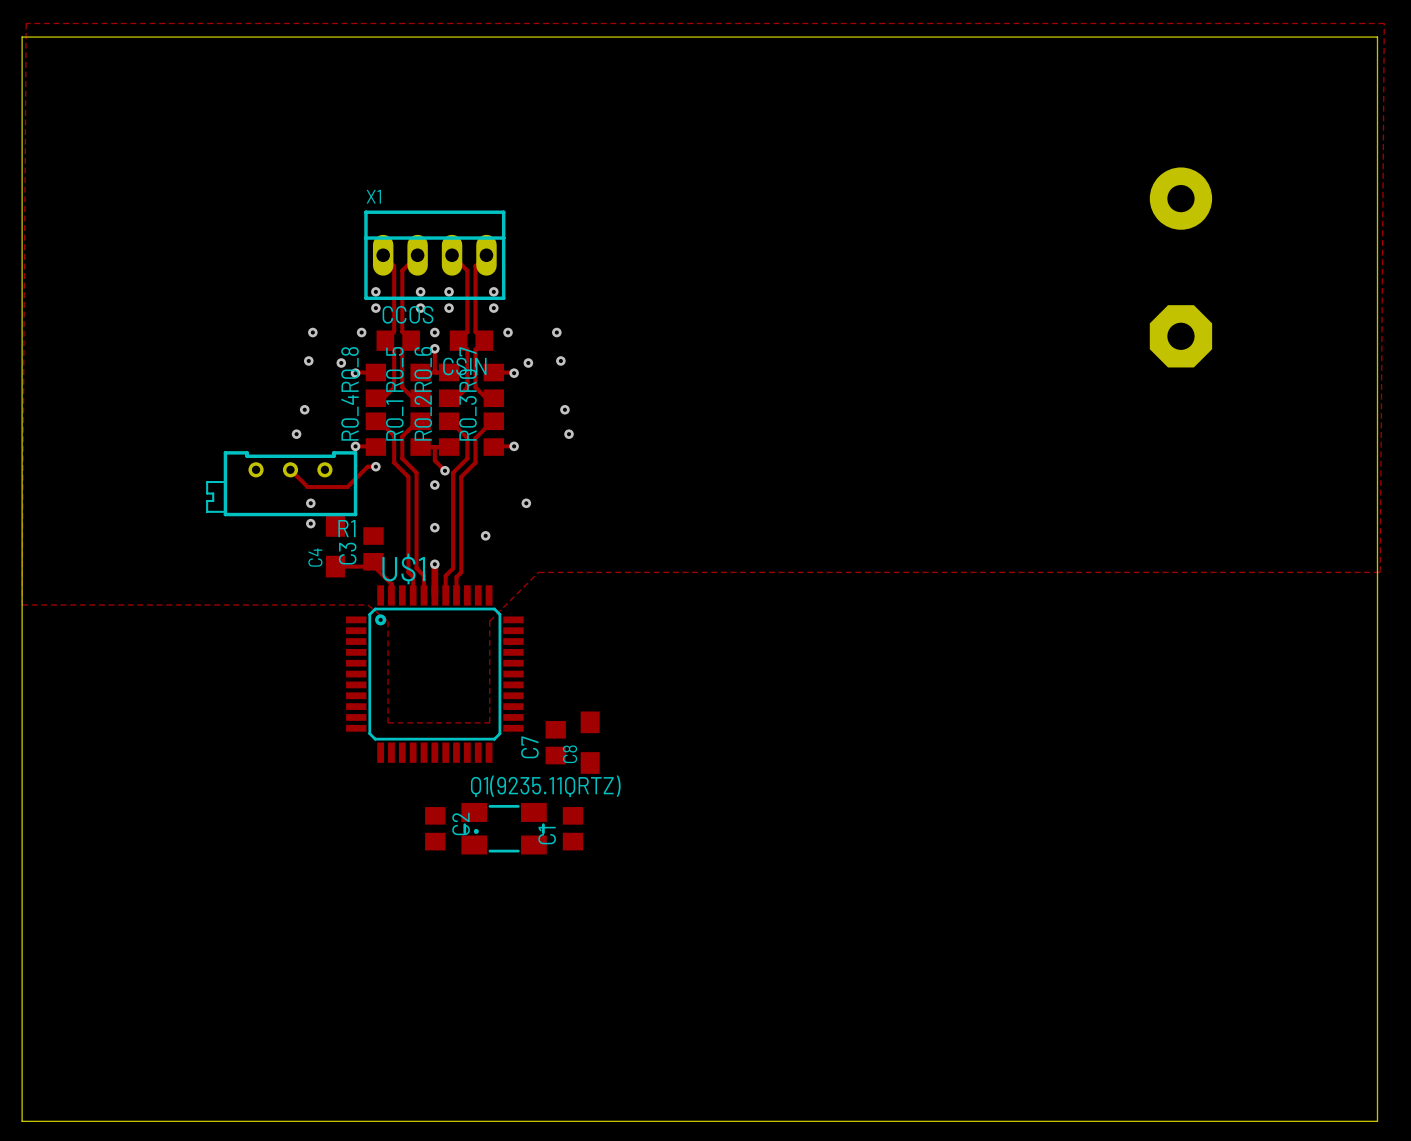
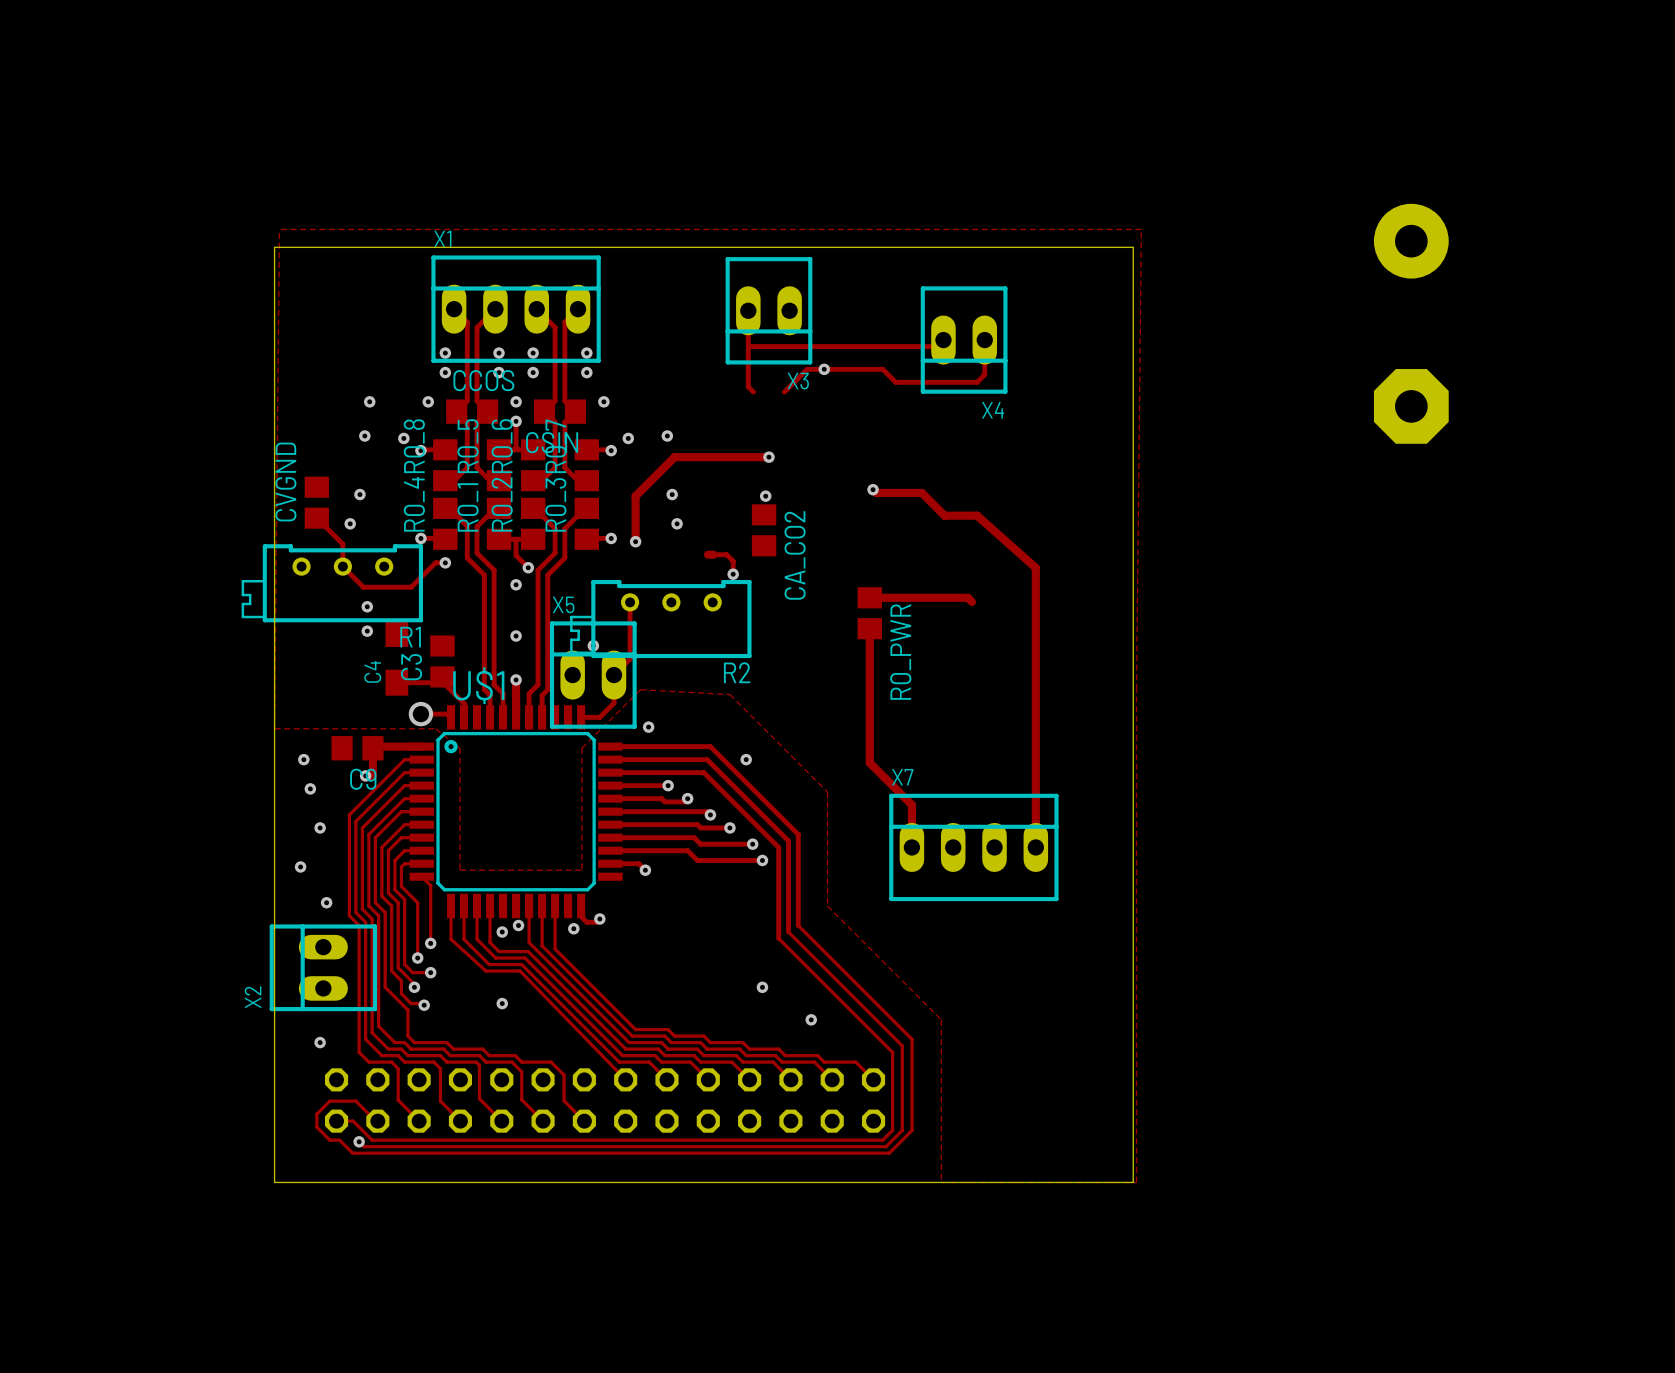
board edge: (22, 37) (1377, 37) (1377, 1121) (22, 1121) (22, 37) -> none
board edge: none -> (274, 247) (1133, 247) (1133, 1182) (274, 1182) (274, 247)
track: none -> (748, 310) (748, 386) (753, 392)
X3: none -> (768, 310)
track: none -> (943, 340) (936, 346) (748, 346)
X4: none -> (964, 340)
track: none -> (984, 340) (984, 374) (977, 382) (895, 382) (882, 369) (807, 369) (784, 392)
via: none -> (824, 369)
via: (556, 332) -> none
track: none -> (768, 457) (674, 457) (635, 496) (635, 541)
via: none -> (768, 457)
track: none -> (873, 489) (876, 492) (921, 492) (944, 515) (977, 515) (1035, 567) (1035, 847)
via: none -> (873, 489)
via: none -> (765, 496)
CVGND: none -> (316, 502)
track: none -> (316, 518) (342, 544) (342, 566)
CA_CO2: none -> (764, 530)
via: none -> (635, 541)
track: none -> (707, 554) (726, 554) (733, 561) (733, 574)
via: none -> (733, 574)
track: none -> (869, 597) (967, 597) (971, 601)
track: none -> (630, 602) (630, 658) (613, 675) (613, 703) (599, 717) (581, 717)
via: (526, 503) -> none
R0_PWR: none -> (869, 613)
R2: none -> (660, 619)
track: none -> (869, 628) (869, 762) (911, 805) (911, 847)
via position: (485, 535) -> (593, 645)
X5: none -> (593, 675)
zone outline: (538, 572) (1380, 572) (1384, 23) (26, 23) (22, 604) (233, 604) -> (640, 689) (729, 694) (827, 792) (827, 906) (941, 1019) (941, 1182) (1136, 1182) (1136, 689) (1141, 229) (279, 229) (274, 728)
track: none -> (420, 714) (447, 714) (451, 717)
via: none -> (420, 714)
via: none -> (648, 727)
track: none -> (421, 746) (374, 746) (372, 748) (372, 775) (365, 775)
track: none -> (610, 746) (710, 746) (798, 834) (798, 925) (912, 1039) (912, 1130) (889, 1153) (352, 1153) (339, 1140) (329, 1140) (316, 1127) (316, 1114) (329, 1101) (355, 1101) (377, 1121)
C9: none -> (357, 748)
via: none -> (303, 759)
track: none -> (421, 759) (404, 759) (349, 814) (349, 915) (359, 925) (359, 1052) (368, 1062) (391, 1062) (398, 1068) (398, 1100) (419, 1121)
track: none -> (610, 759) (707, 759) (788, 840) (788, 932) (902, 1045) (902, 1130) (886, 1146) (364, 1146) (359, 1141)
via: none -> (746, 759)
track: none -> (421, 772) (404, 772) (355, 821) (355, 912) (365, 922) (365, 1039) (381, 1055) (398, 1055) (404, 1062) (433, 1062) (440, 1068) (440, 1101) (460, 1121)
track: none -> (610, 772) (703, 772) (778, 847) (778, 938) (892, 1052) (892, 1130) (882, 1140) (372, 1140) (353, 1121) (336, 1121)
via: none -> (365, 775)
track: none -> (421, 785) (404, 785) (362, 827) (362, 909) (372, 919) (372, 1032) (388, 1049) (401, 1049) (407, 1055) (440, 1055) (446, 1062) (476, 1062) (479, 1065) (479, 1098) (501, 1121)
track: none -> (610, 785) (668, 785)
via: none -> (668, 785)
via: none -> (310, 788)
track: none -> (421, 798) (404, 798) (368, 834) (368, 906) (378, 915) (378, 1026) (394, 1042) (404, 1042) (411, 1049) (443, 1049) (450, 1055) (479, 1055) (485, 1062) (512, 1062) (521, 1071) (521, 1099) (543, 1121)
track: none -> (610, 798) (661, 798) (664, 801) (684, 801) (687, 798)
via: none -> (687, 798)
track: none -> (421, 811) (401, 811) (375, 837) (375, 902) (385, 912) (385, 987) (407, 1010) (407, 1036) (414, 1042) (446, 1042) (453, 1049) (482, 1049) (489, 1055) (515, 1055) (521, 1062) (551, 1062) (564, 1075) (564, 1100) (584, 1121)
track: none -> (610, 811) (707, 811) (710, 814)
via: none -> (710, 814)
track: none -> (421, 824) (404, 824) (381, 847) (381, 896) (391, 906) (391, 971) (401, 980) (401, 993) (411, 1003) (424, 1005)
track: none -> (610, 824) (697, 824) (700, 827) (729, 827)
via: none -> (320, 827)
via: none -> (729, 827)
track: none -> (421, 837) (401, 837) (388, 850) (388, 892) (398, 902) (398, 967) (414, 984) (414, 987)
track: none -> (610, 837) (694, 837) (700, 844) (752, 844)
via: none -> (752, 844)
X7: none -> (973, 847)
track: none -> (421, 850) (404, 850) (394, 860) (394, 889) (404, 899) (404, 964) (412, 972) (430, 972)
track: none -> (610, 850) (687, 850) (697, 860) (762, 860)
via: none -> (762, 860)
track: none -> (421, 863) (404, 863) (401, 866) (401, 886) (417, 902) (417, 958)
track: none -> (610, 863) (638, 863) (645, 870)
via: none -> (300, 866)
via: none -> (645, 870)
track: none -> (421, 876) (430, 885) (430, 943)
C7: (555, 742) -> none
C8: (590, 742) -> none
via: none -> (326, 902)
track: none -> (451, 906) (451, 939) (485, 971) (520, 971) (625, 1079)
track: none -> (464, 906) (464, 939) (489, 964) (521, 964) (619, 1062) (649, 1062) (666, 1079)
track: none -> (477, 906) (477, 939) (495, 958) (525, 958) (622, 1055) (655, 1055) (661, 1062) (690, 1062) (708, 1079)
track: none -> (490, 906) (490, 942) (499, 951) (528, 951) (625, 1049) (658, 1049) (664, 1055) (694, 1055) (700, 1062) (731, 1062) (749, 1079)
track: none -> (529, 906) (529, 942) (629, 1042) (661, 1042) (668, 1049) (697, 1049) (703, 1055) (736, 1055) (742, 1062) (773, 1062) (790, 1079)
track: none -> (542, 906) (542, 945) (632, 1036) (664, 1036) (671, 1042) (700, 1042) (707, 1049) (739, 1049) (746, 1055) (775, 1055) (781, 1062) (814, 1062) (832, 1079)
track: none -> (555, 906) (555, 949) (635, 1029) (668, 1029) (674, 1036) (703, 1036) (710, 1042) (742, 1042) (749, 1049) (778, 1049) (785, 1055) (817, 1055) (824, 1062) (855, 1062) (873, 1079)
track: none -> (581, 906) (581, 916) (586, 922) (596, 922) (599, 919)
via: none -> (599, 919)
via: none -> (518, 925)
via: none -> (573, 928)
via: none -> (502, 932)
via: none -> (430, 943)
via: none -> (417, 958)
X2: none -> (323, 967)
via: none -> (430, 972)
via: none -> (414, 987)
via: none -> (762, 987)
C2: (435, 828) -> none
Q1(9235.11QRTZ): (504, 828) -> none
C1: (572, 828) -> none
via: none -> (502, 1003)
via: none -> (424, 1005)
via: none -> (811, 1019)
via: none -> (320, 1042)
part: none -> (460, 1100)
part: none -> (749, 1100)
via: none -> (359, 1141)

